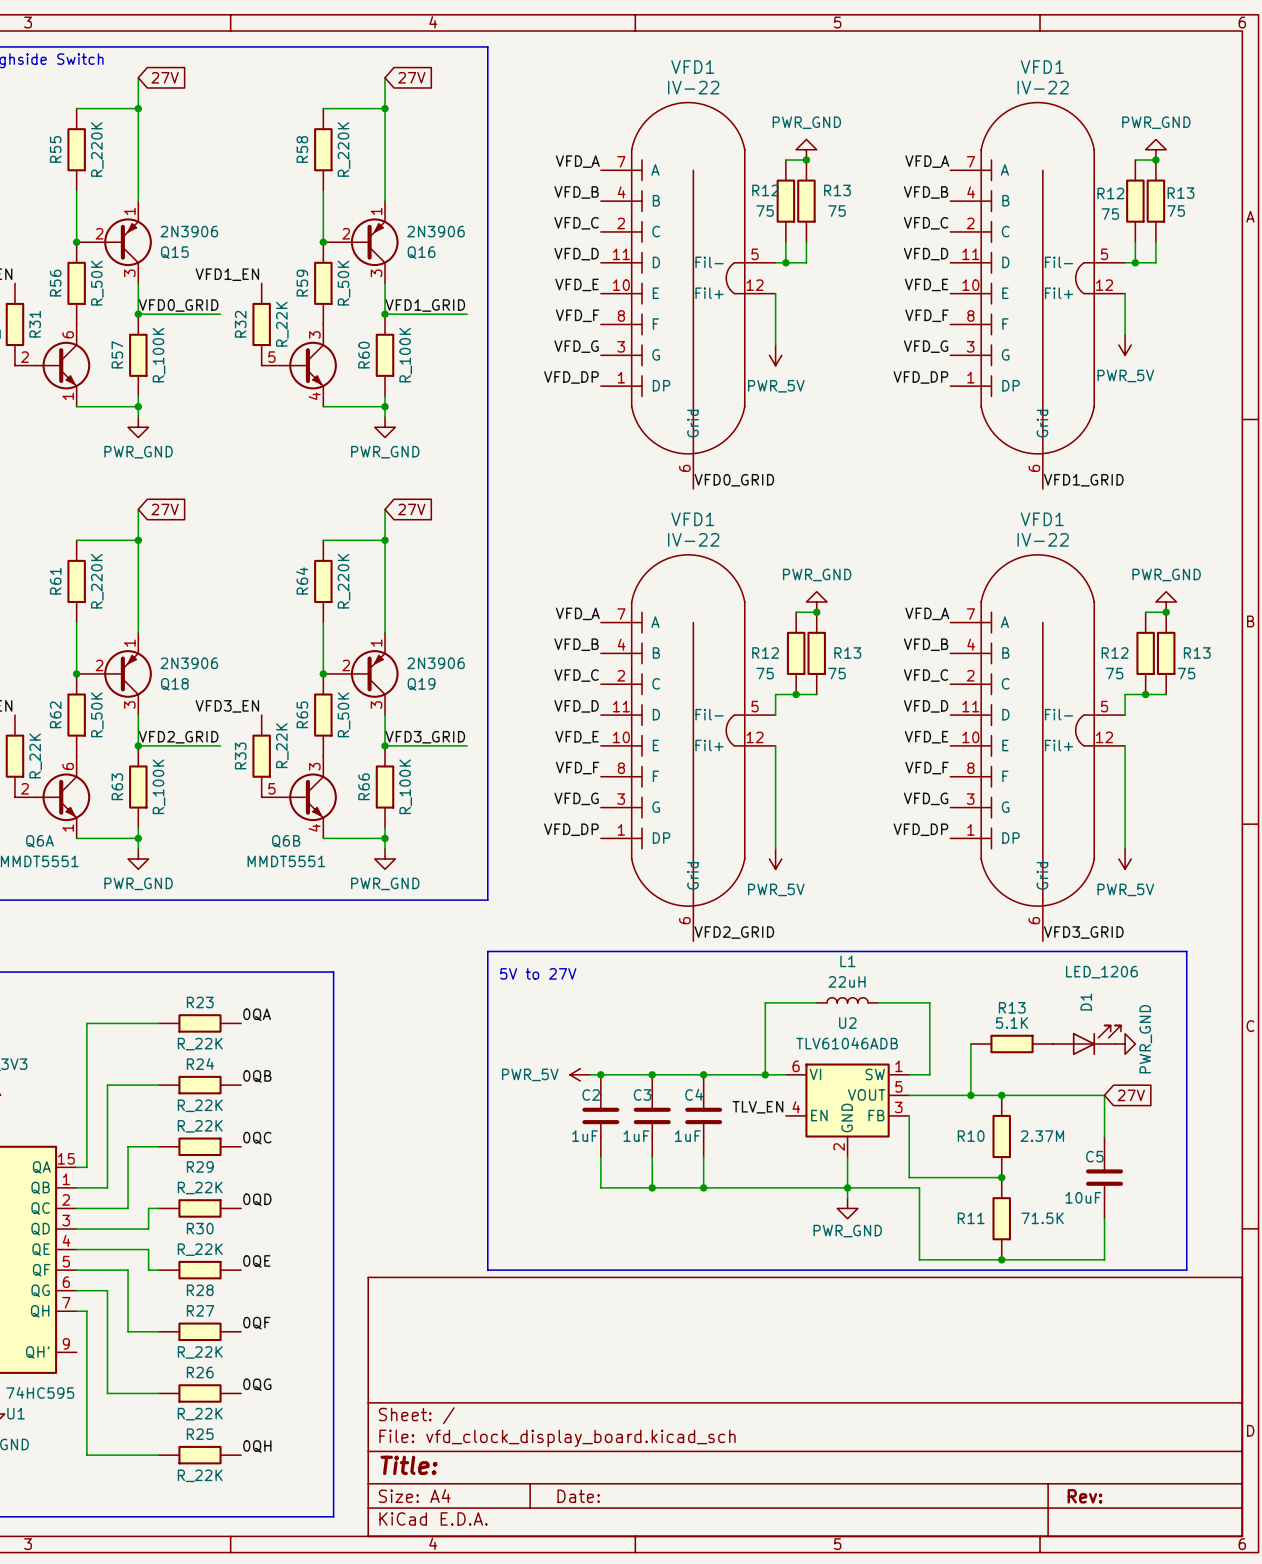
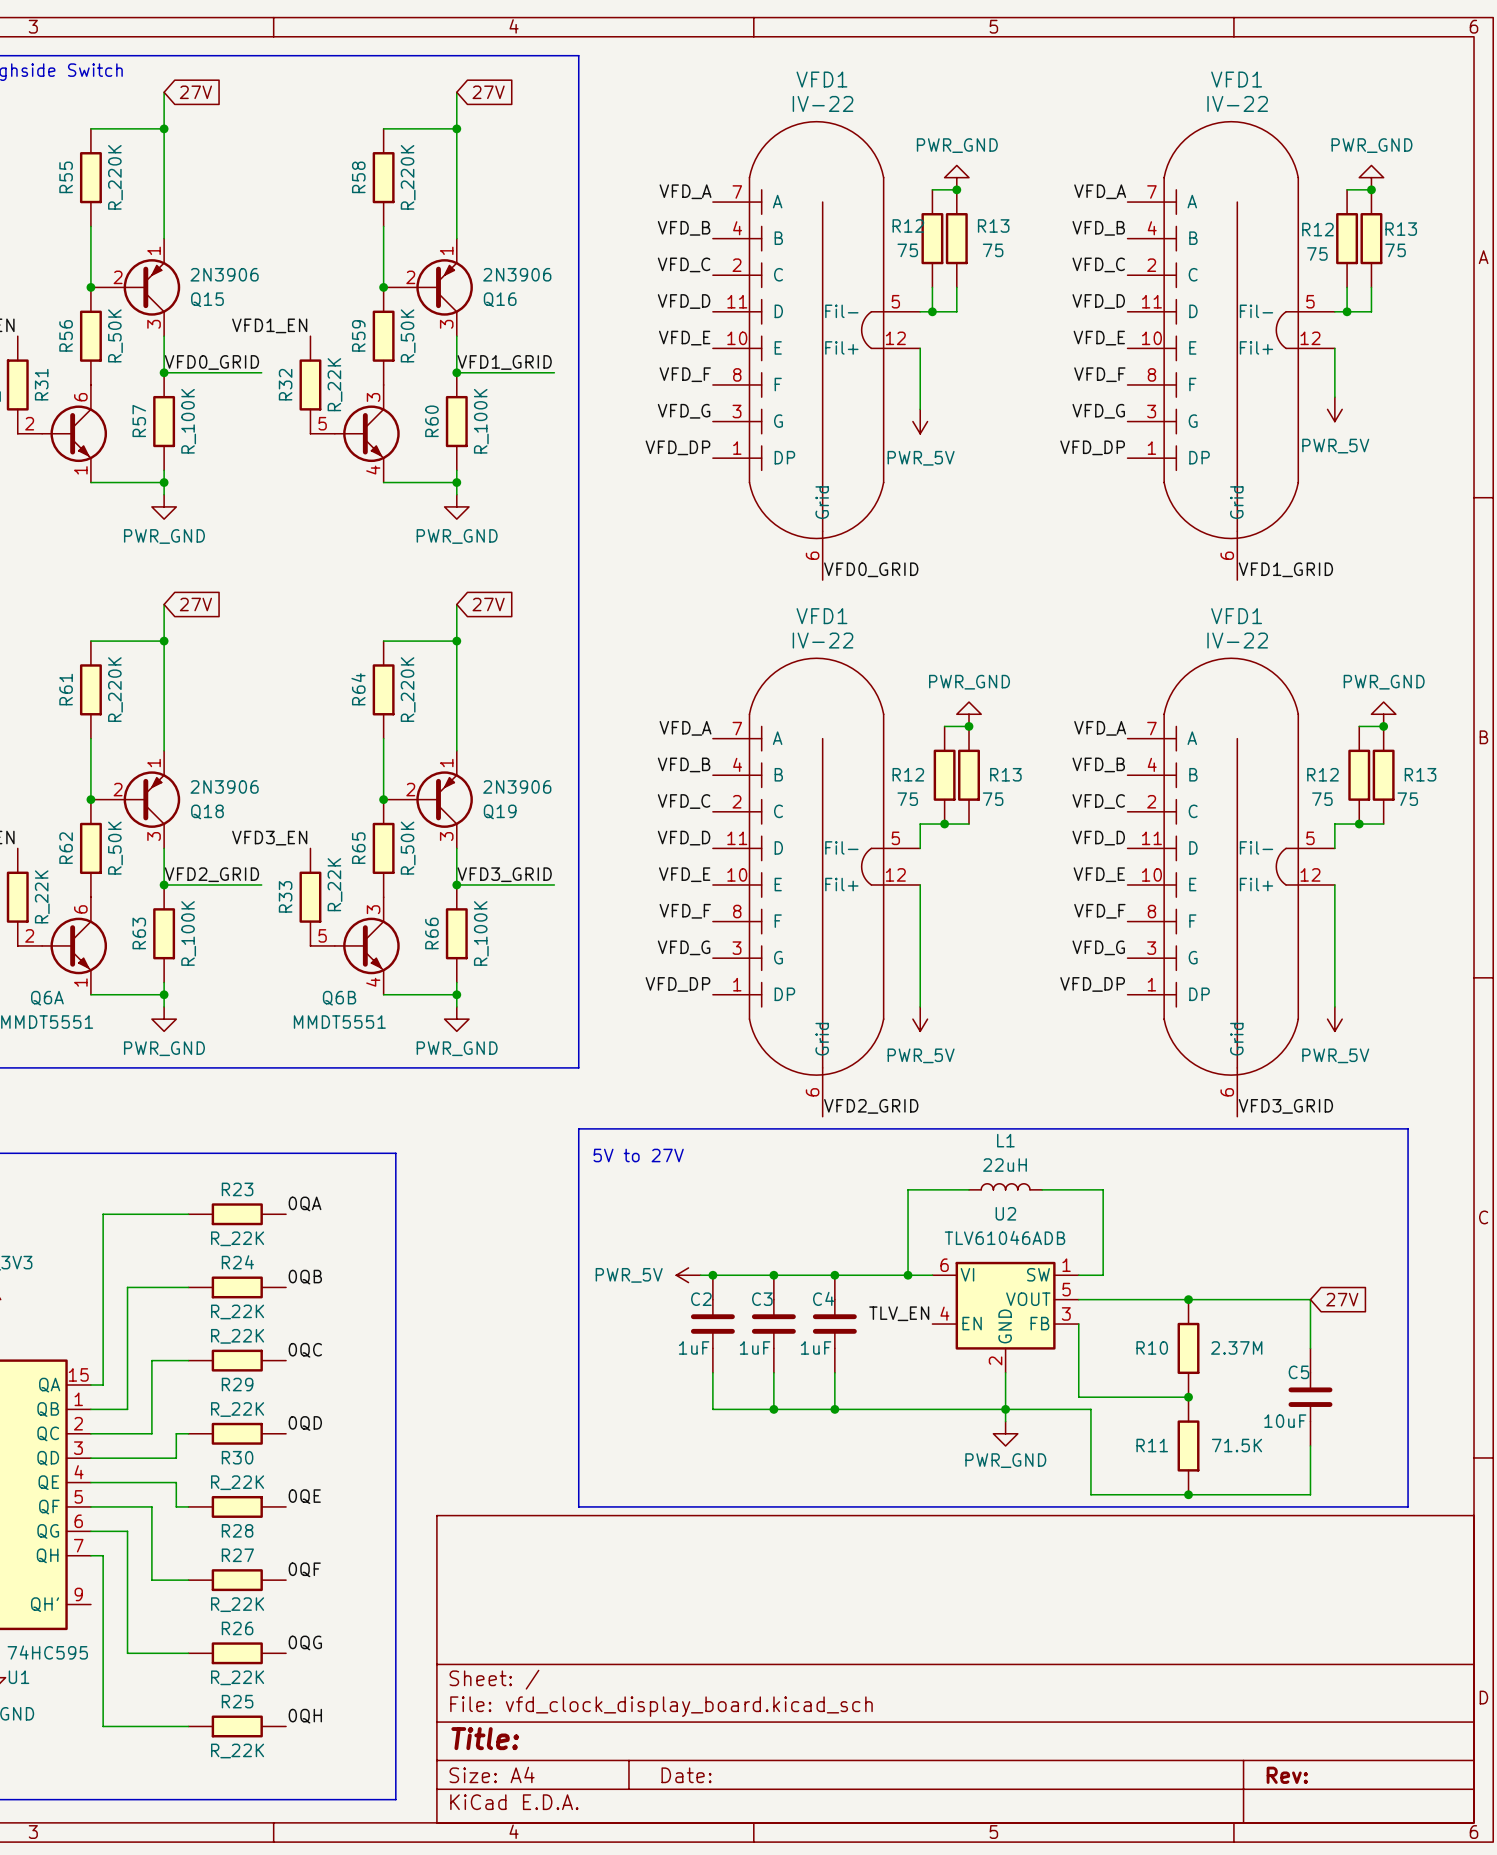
D1: LED_1206 (1087, 1040) -> none
wire: (970, 1043) (970, 1095) -> none
R13: 5.1K (1012, 1043) -> none
power symbol: PWR_GND (1125, 1043) -> none
junction: (970, 1095) -> none

